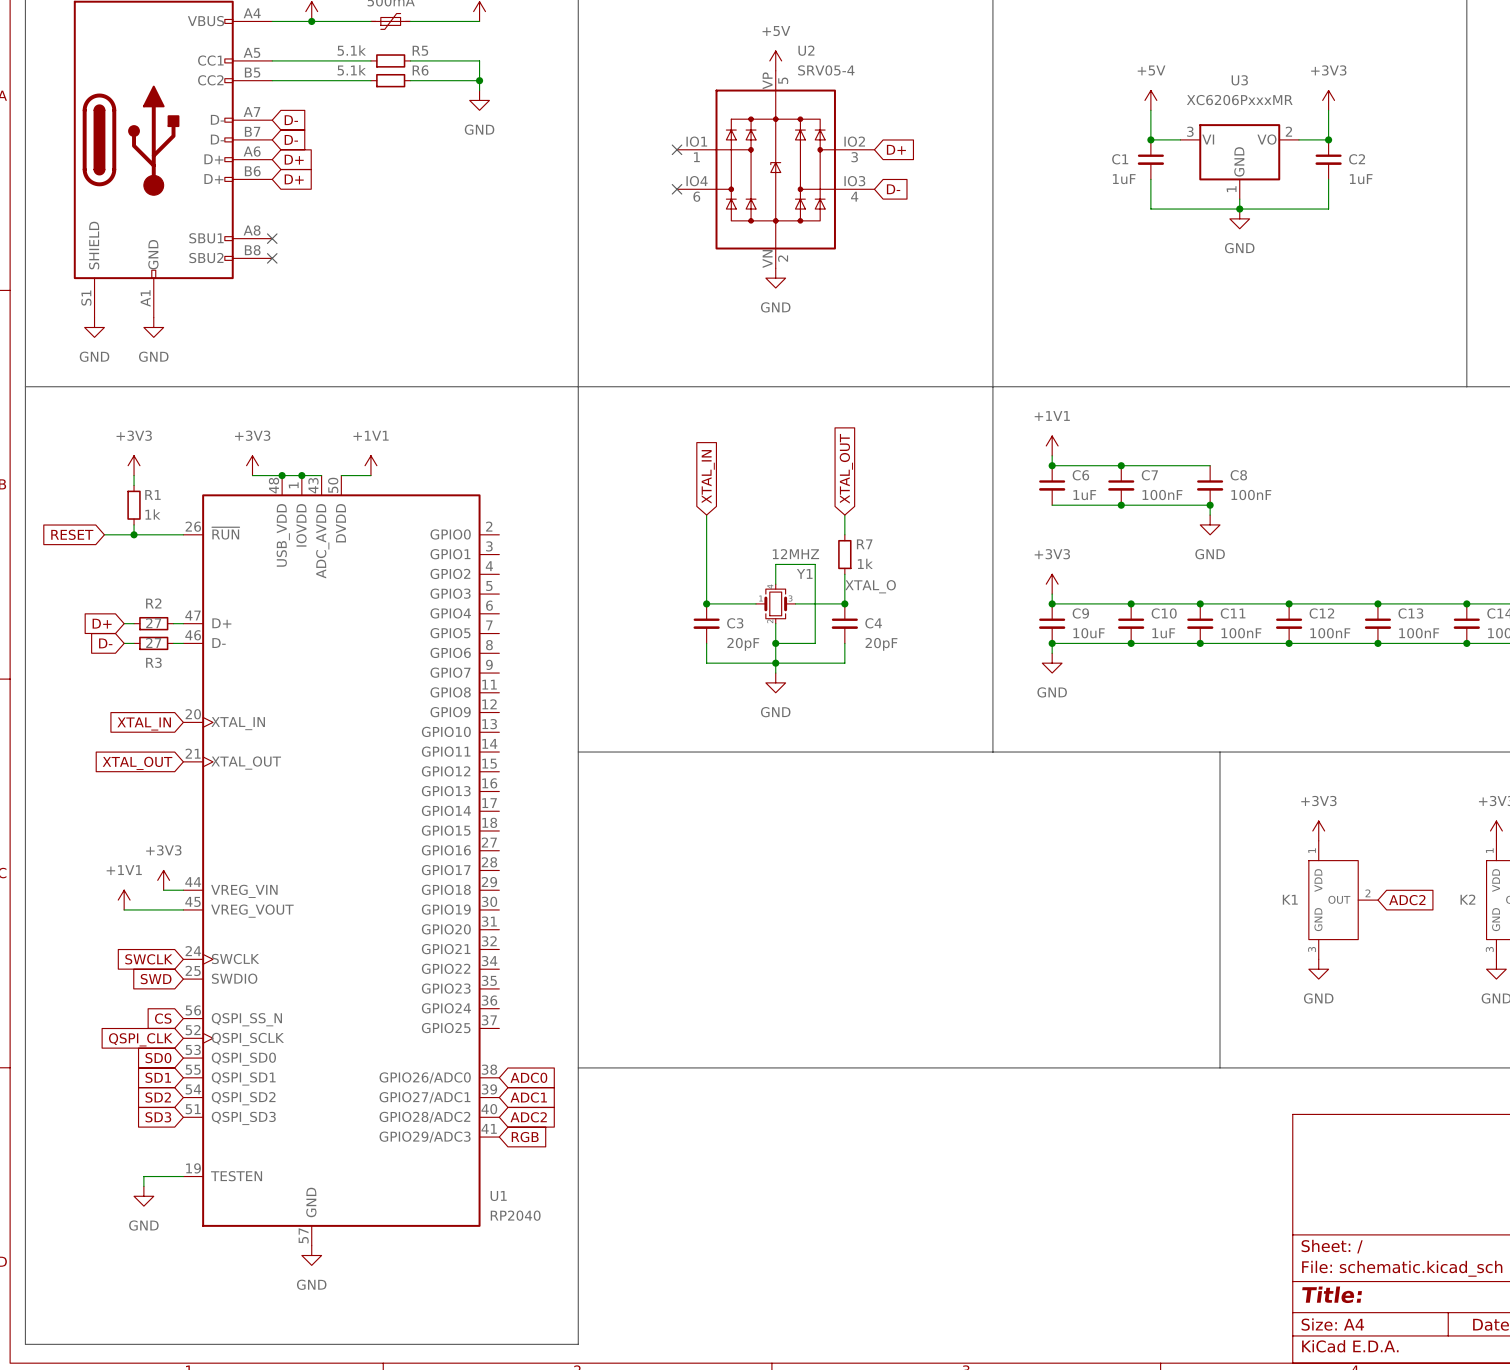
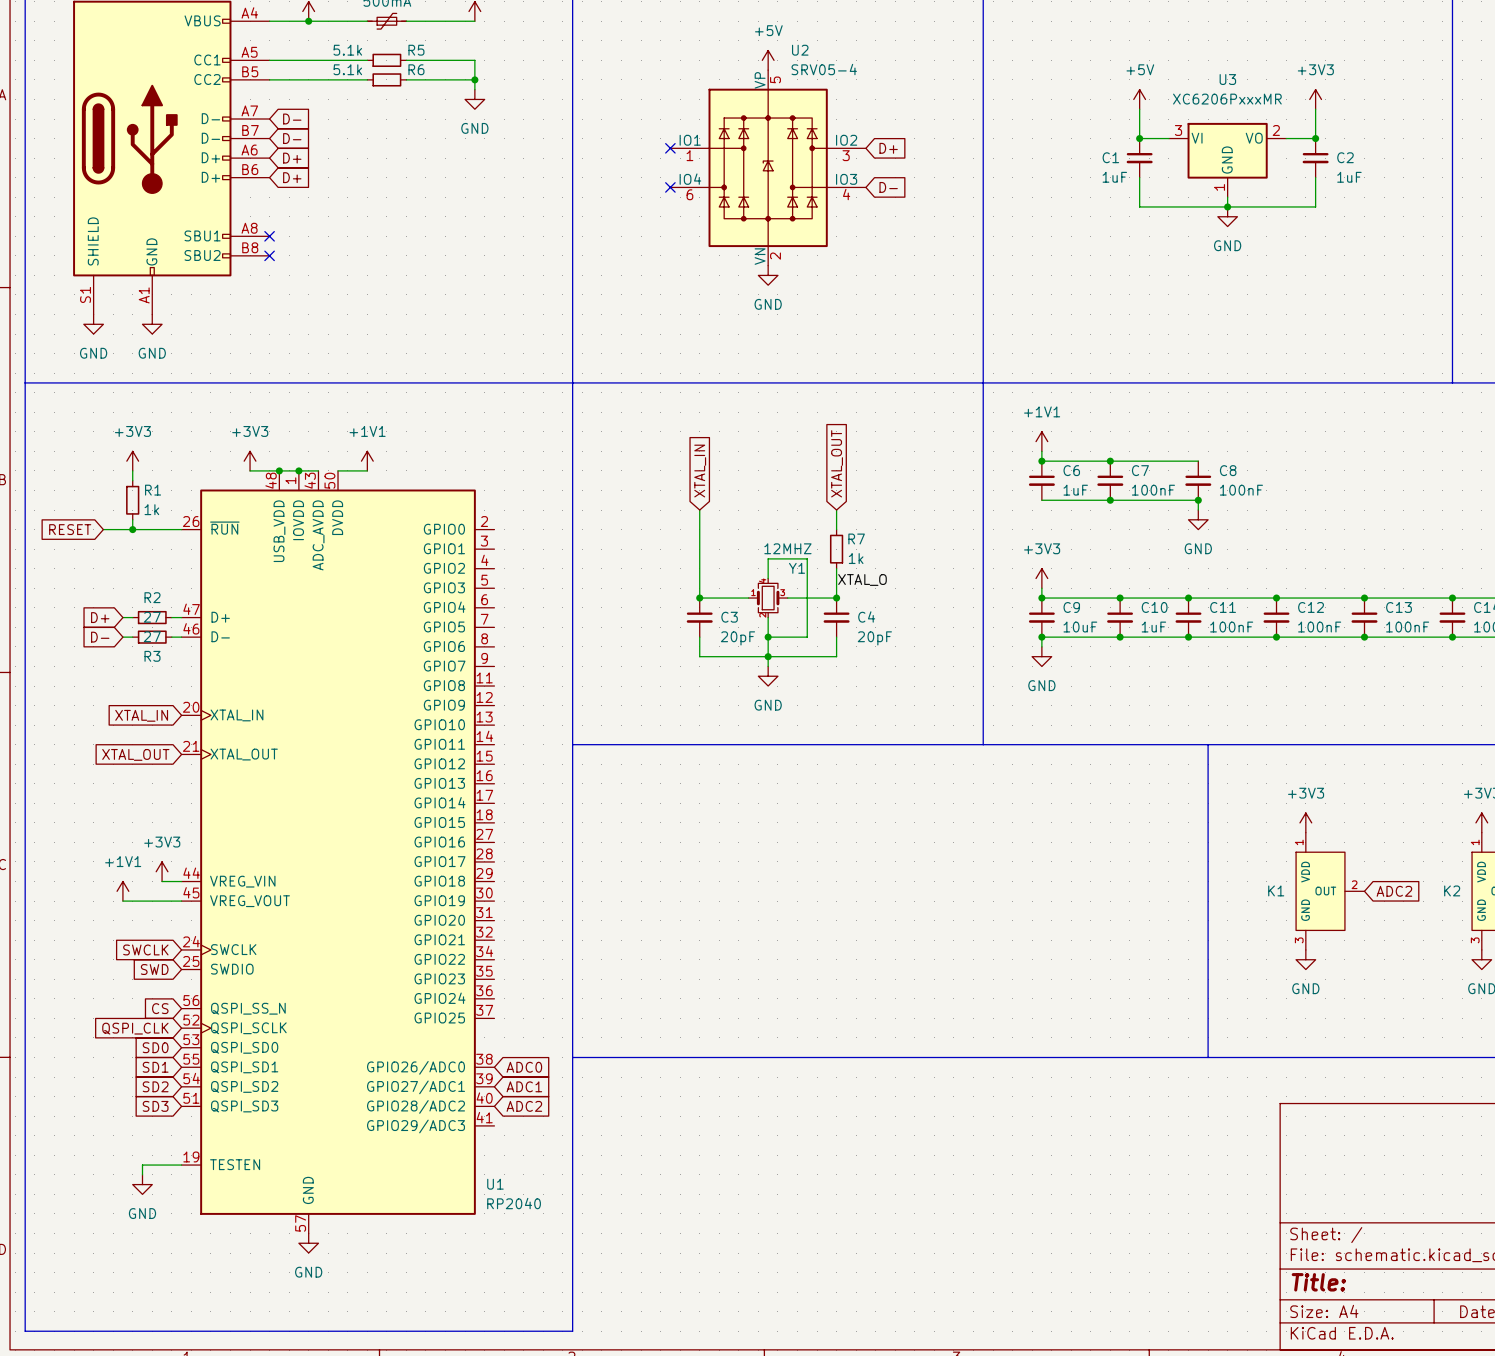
global label: RGB (525, 1137) -> none

